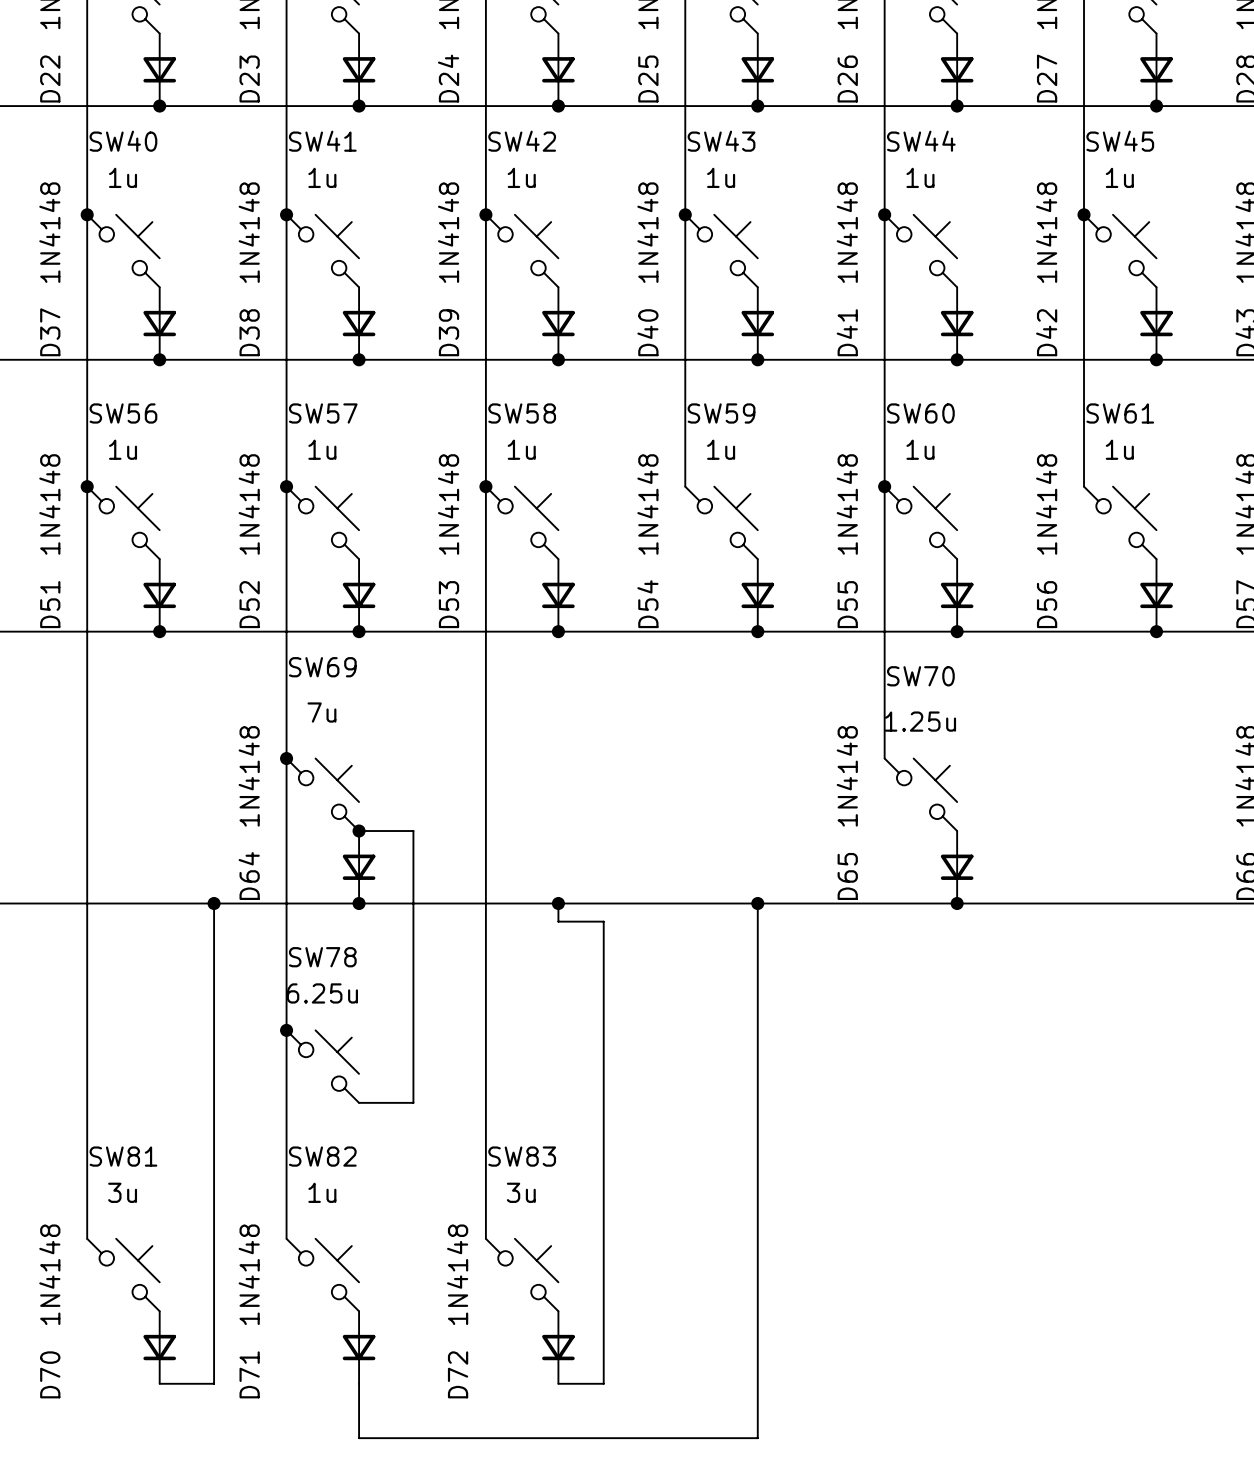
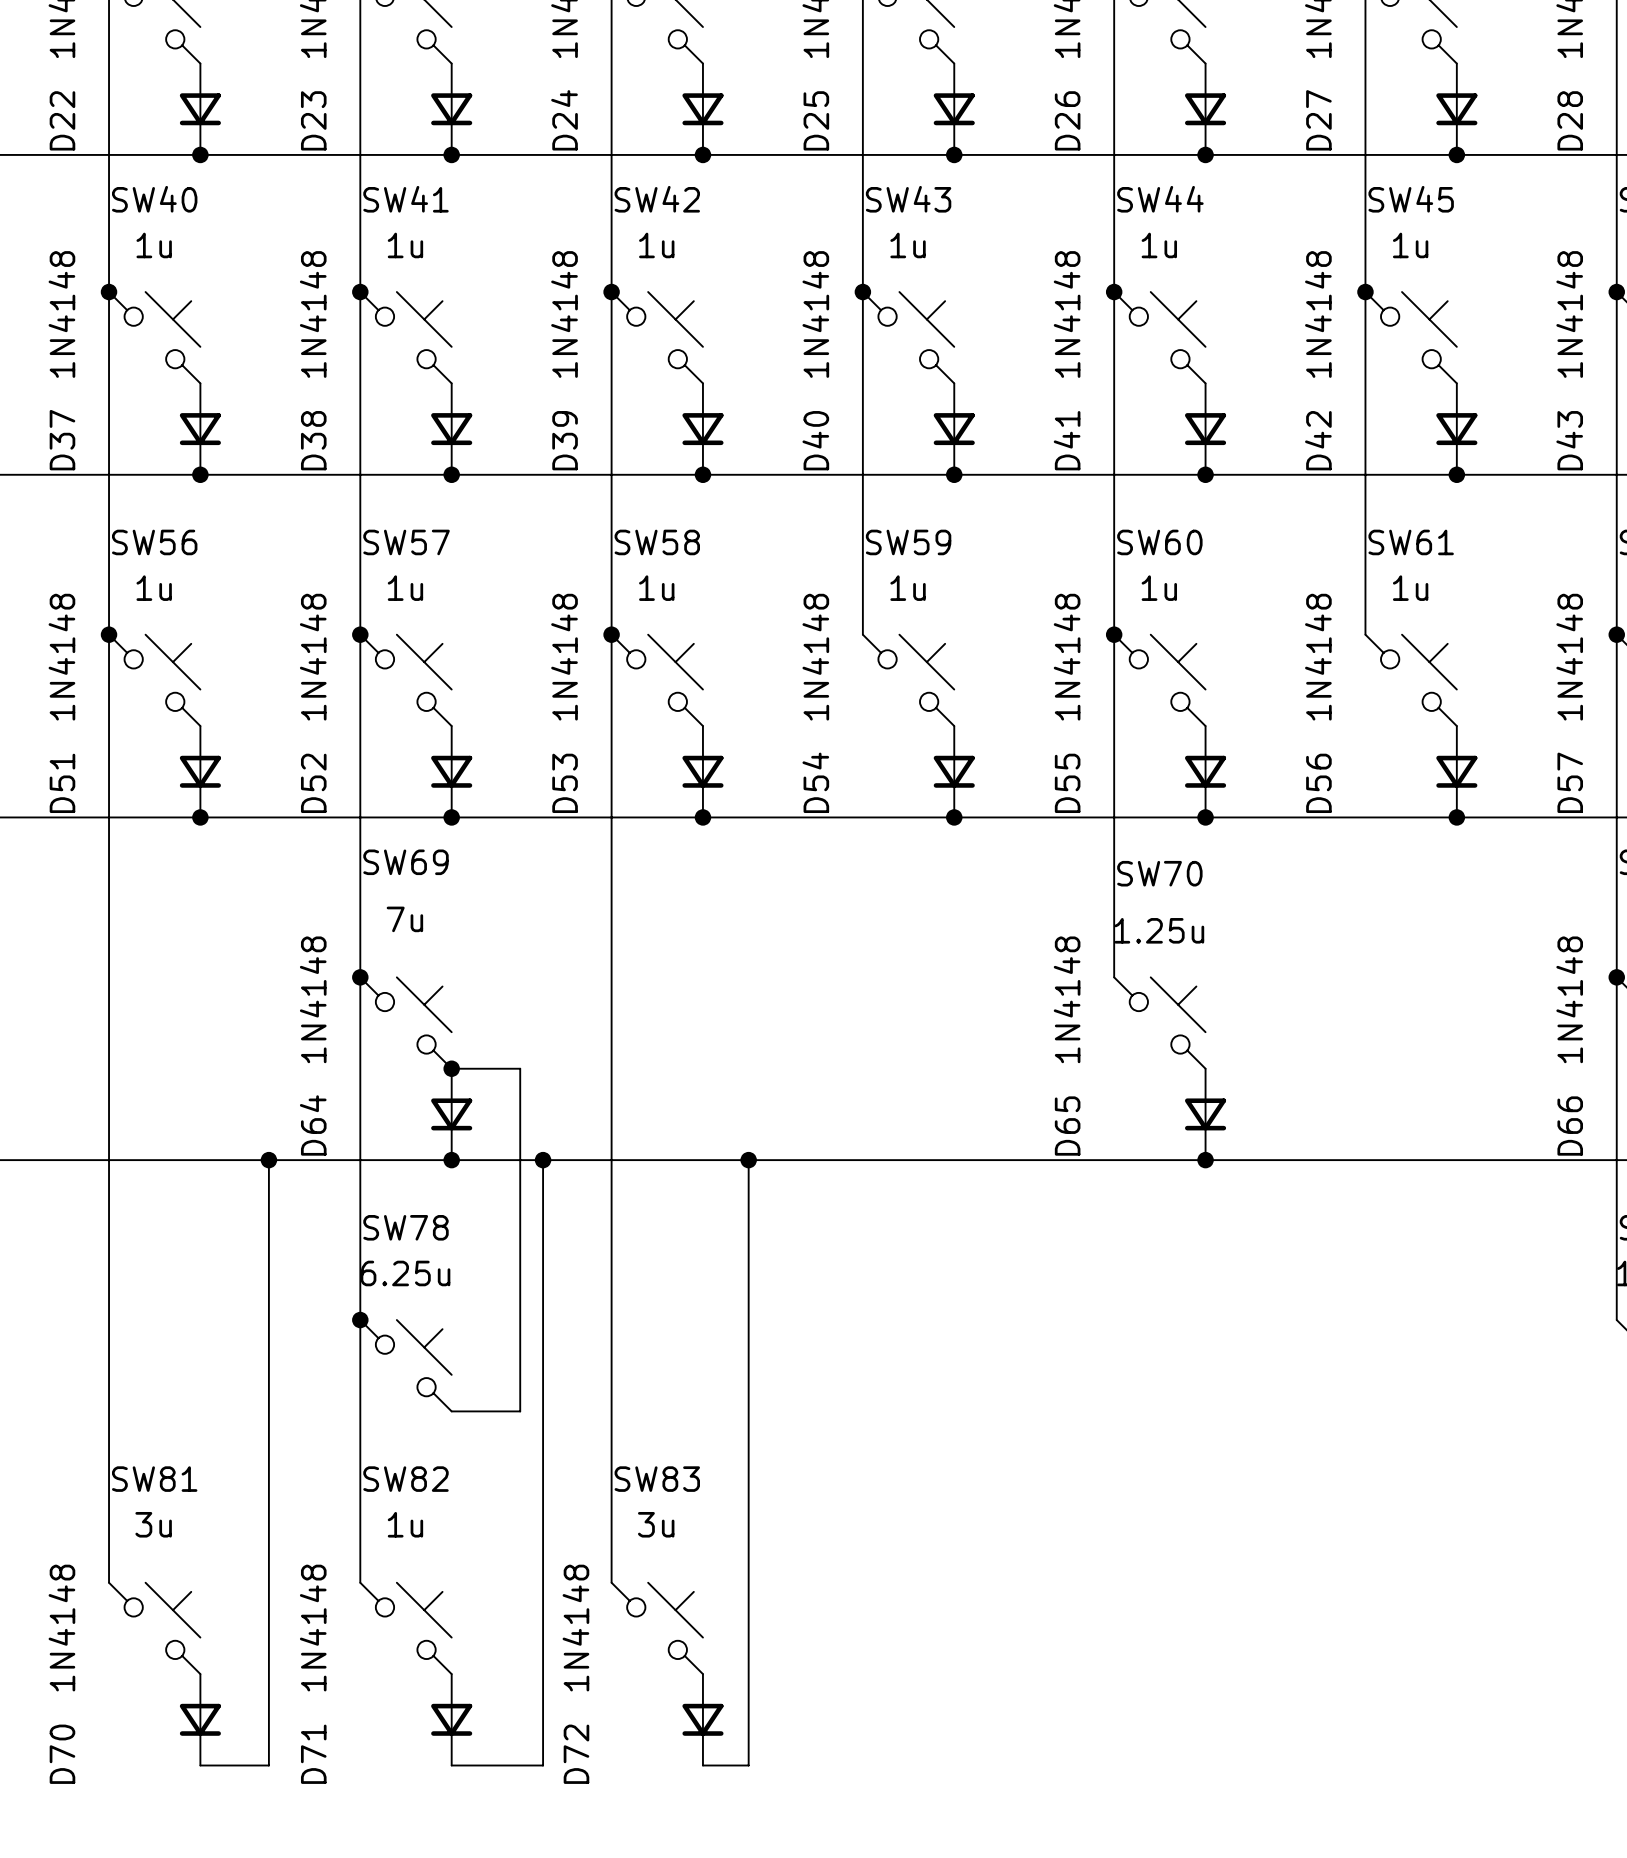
junction: none -> (543, 1160)
wire: (558, 903) (558, 921) (603, 921) (603, 1383) (594, 1383) -> (748, 1160) (748, 1765)
junction position: (558, 903) -> (748, 1160)
wire: (757, 903) (757, 1438) (359, 1438) (359, 1383) -> (543, 1160) (543, 1765) (451, 1765)
junction: (757, 903) -> none

